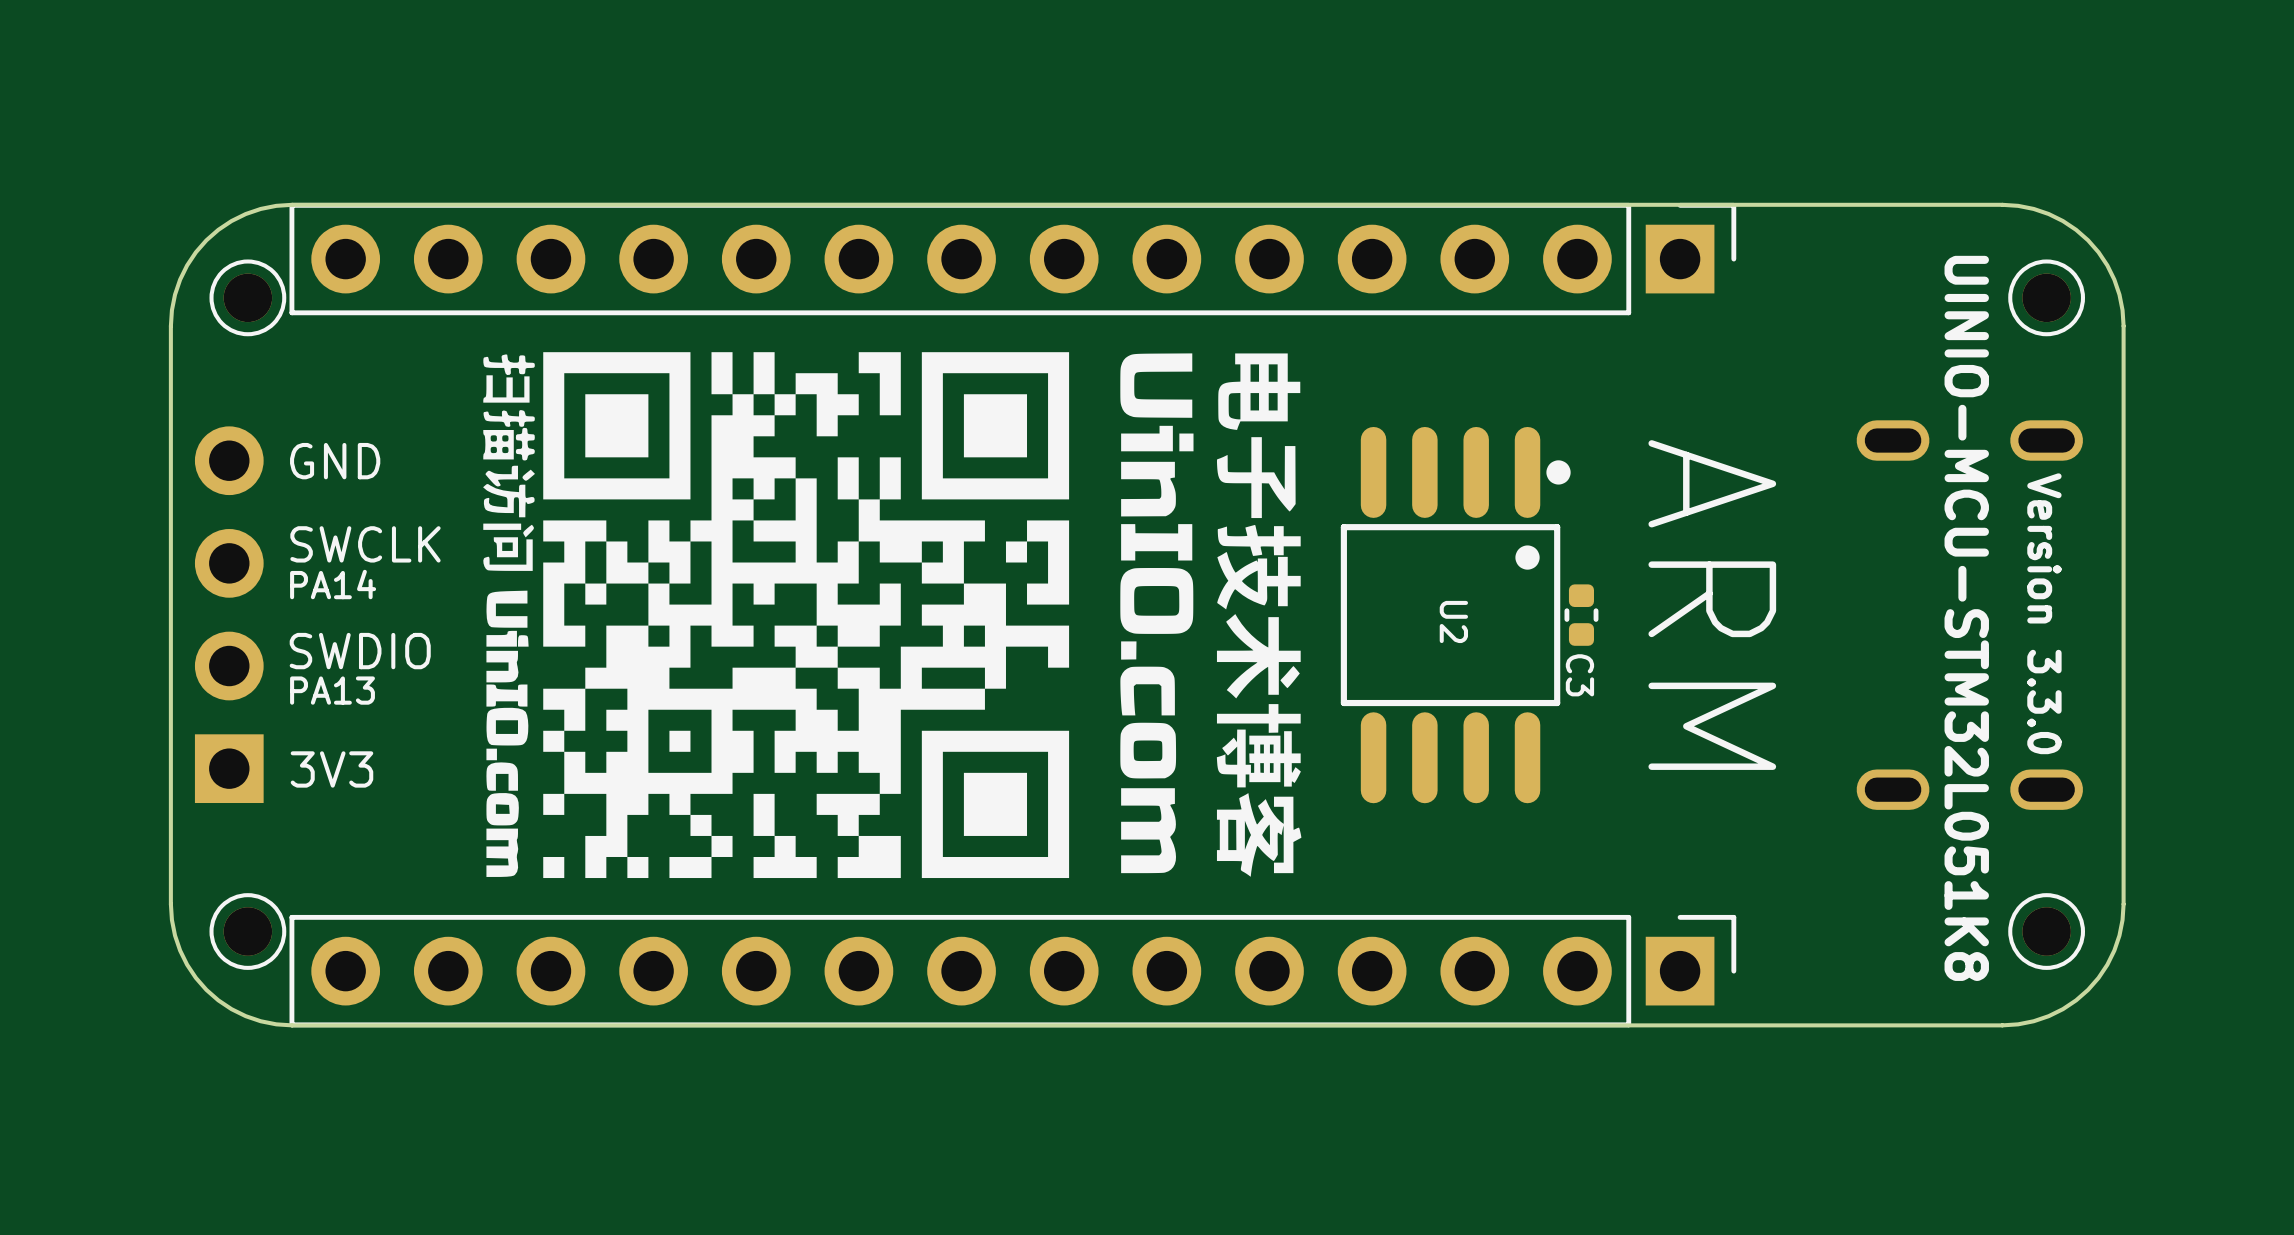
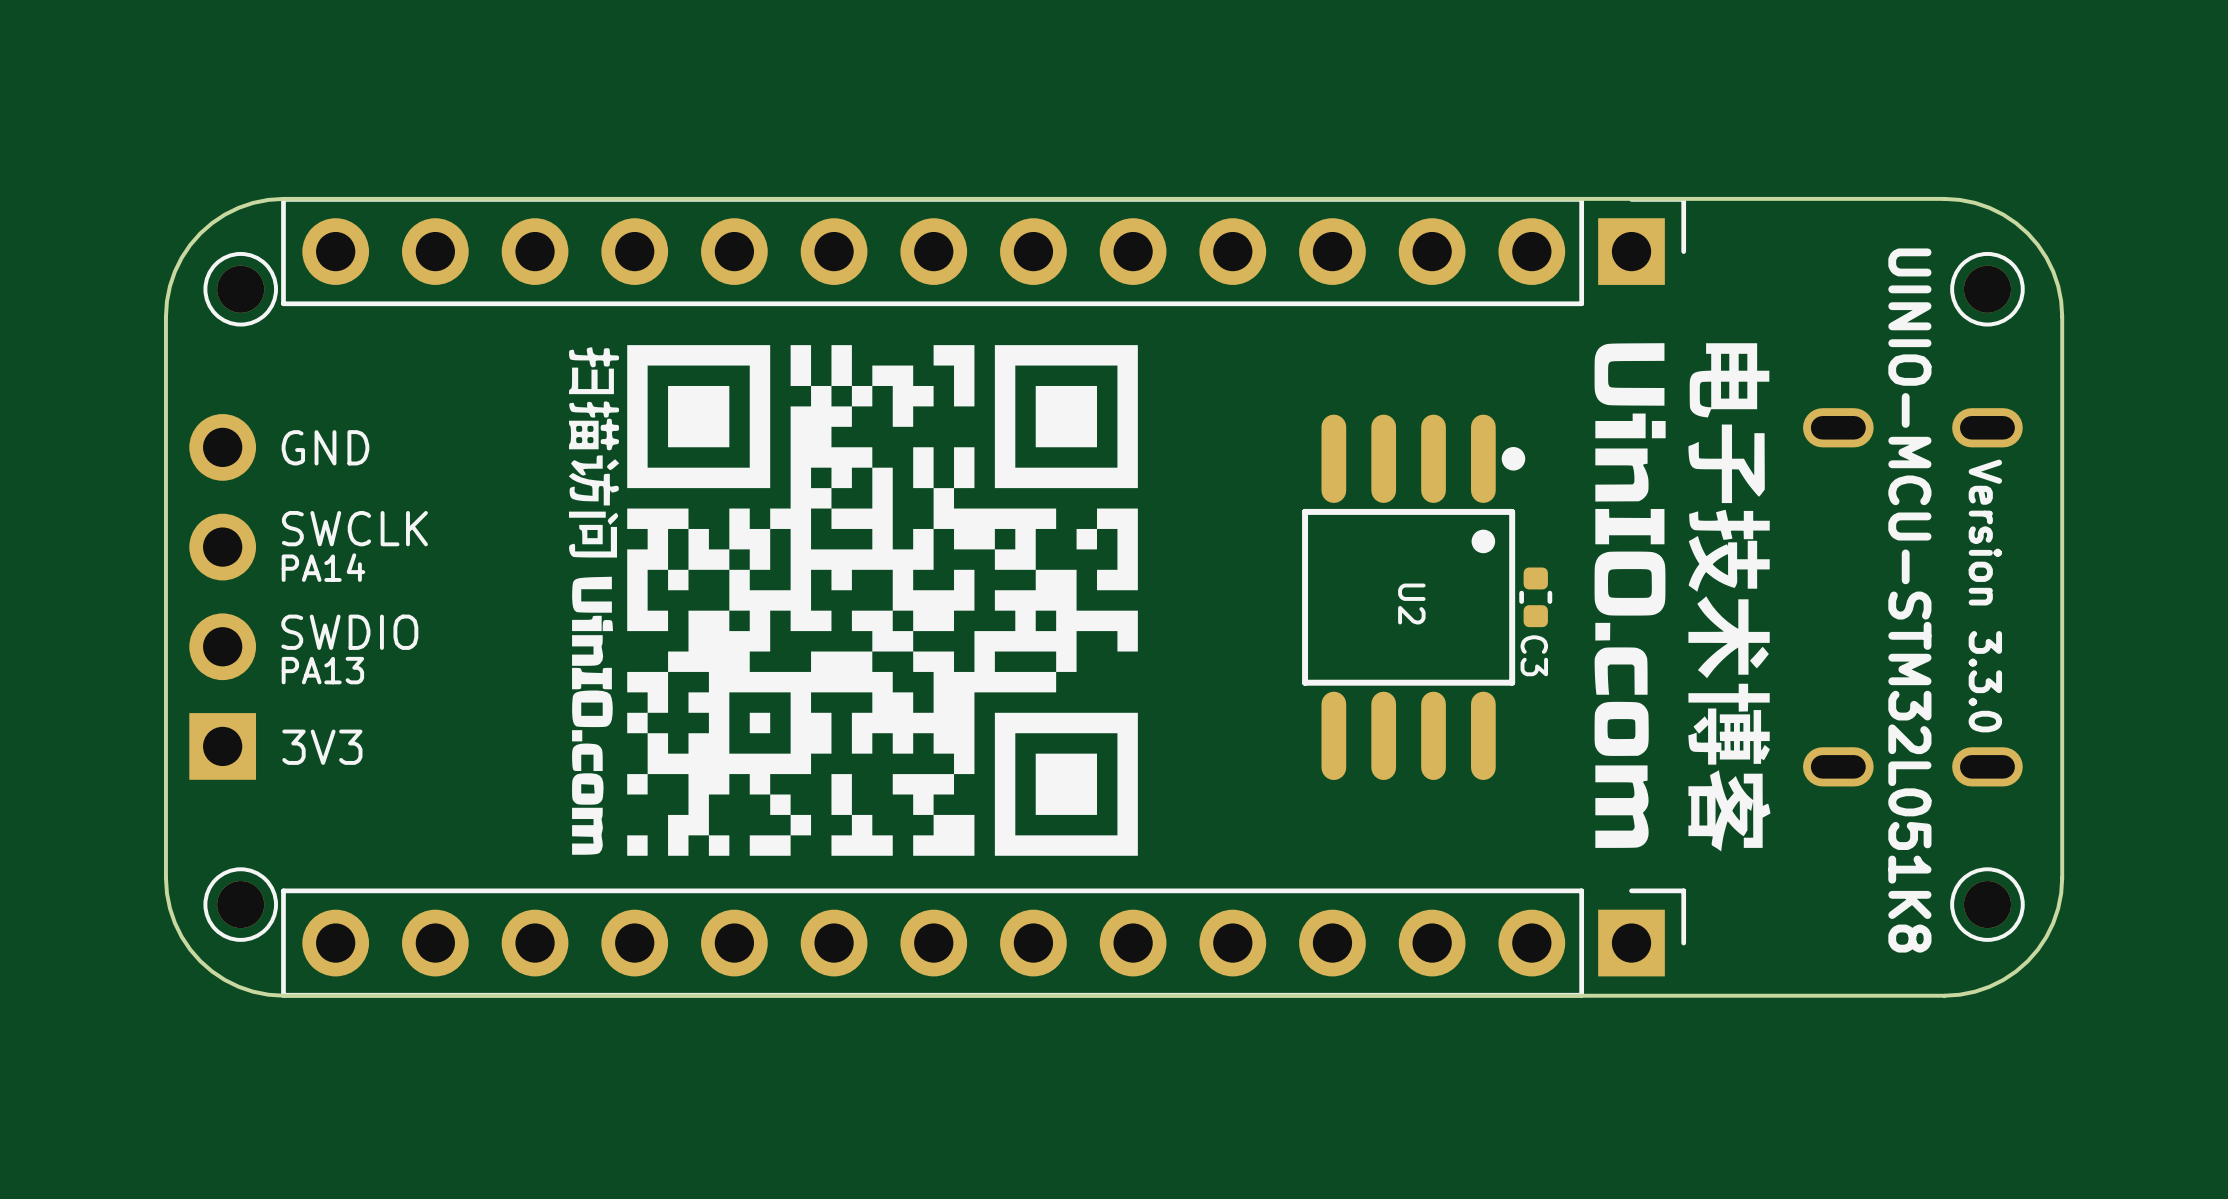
text: ARM (1712, 605) -> none
drawing position: (776, 615) -> (853, 600)
drawing position: (1210, 615) -> (1682, 597)

